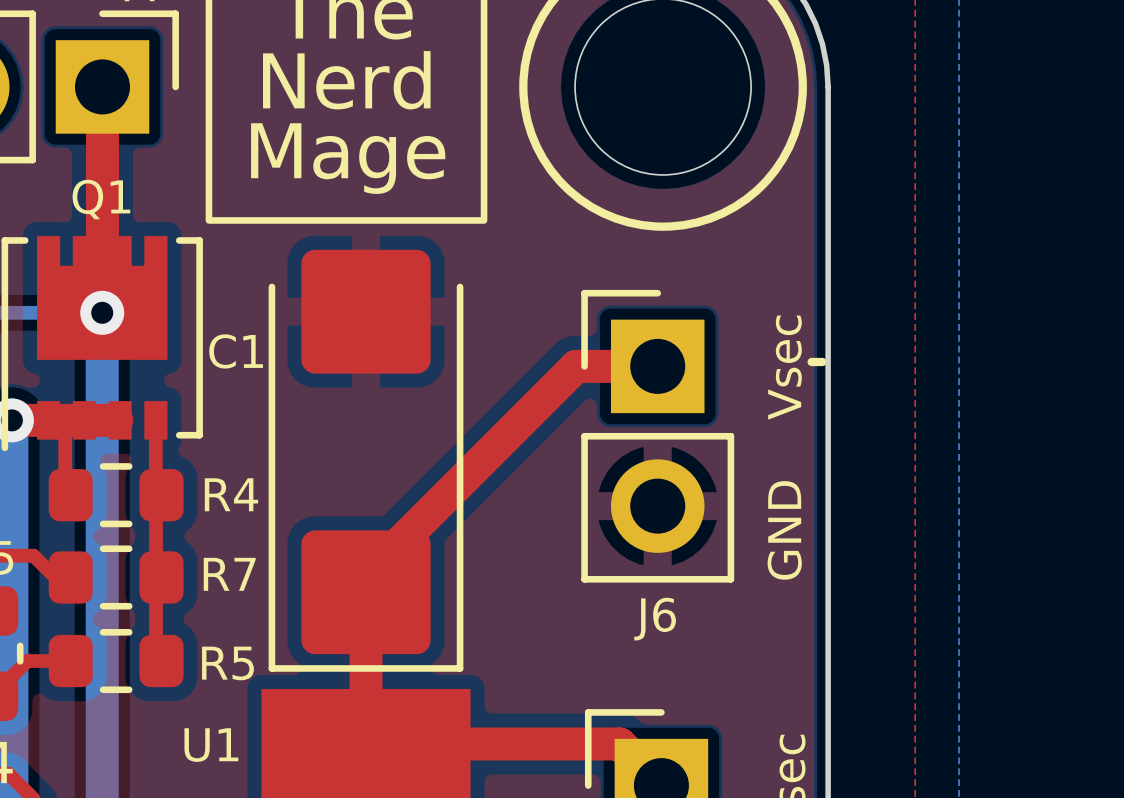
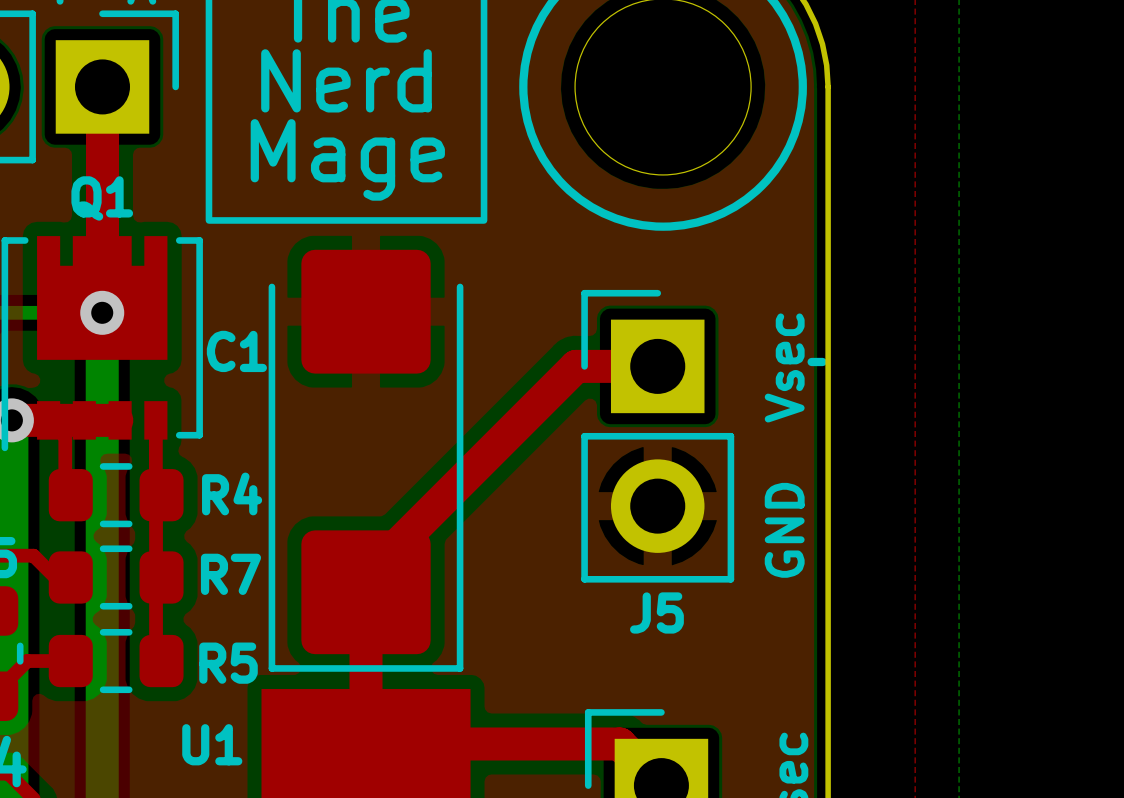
J6 name: J6 (655, 619) -> J5 (656, 612)

